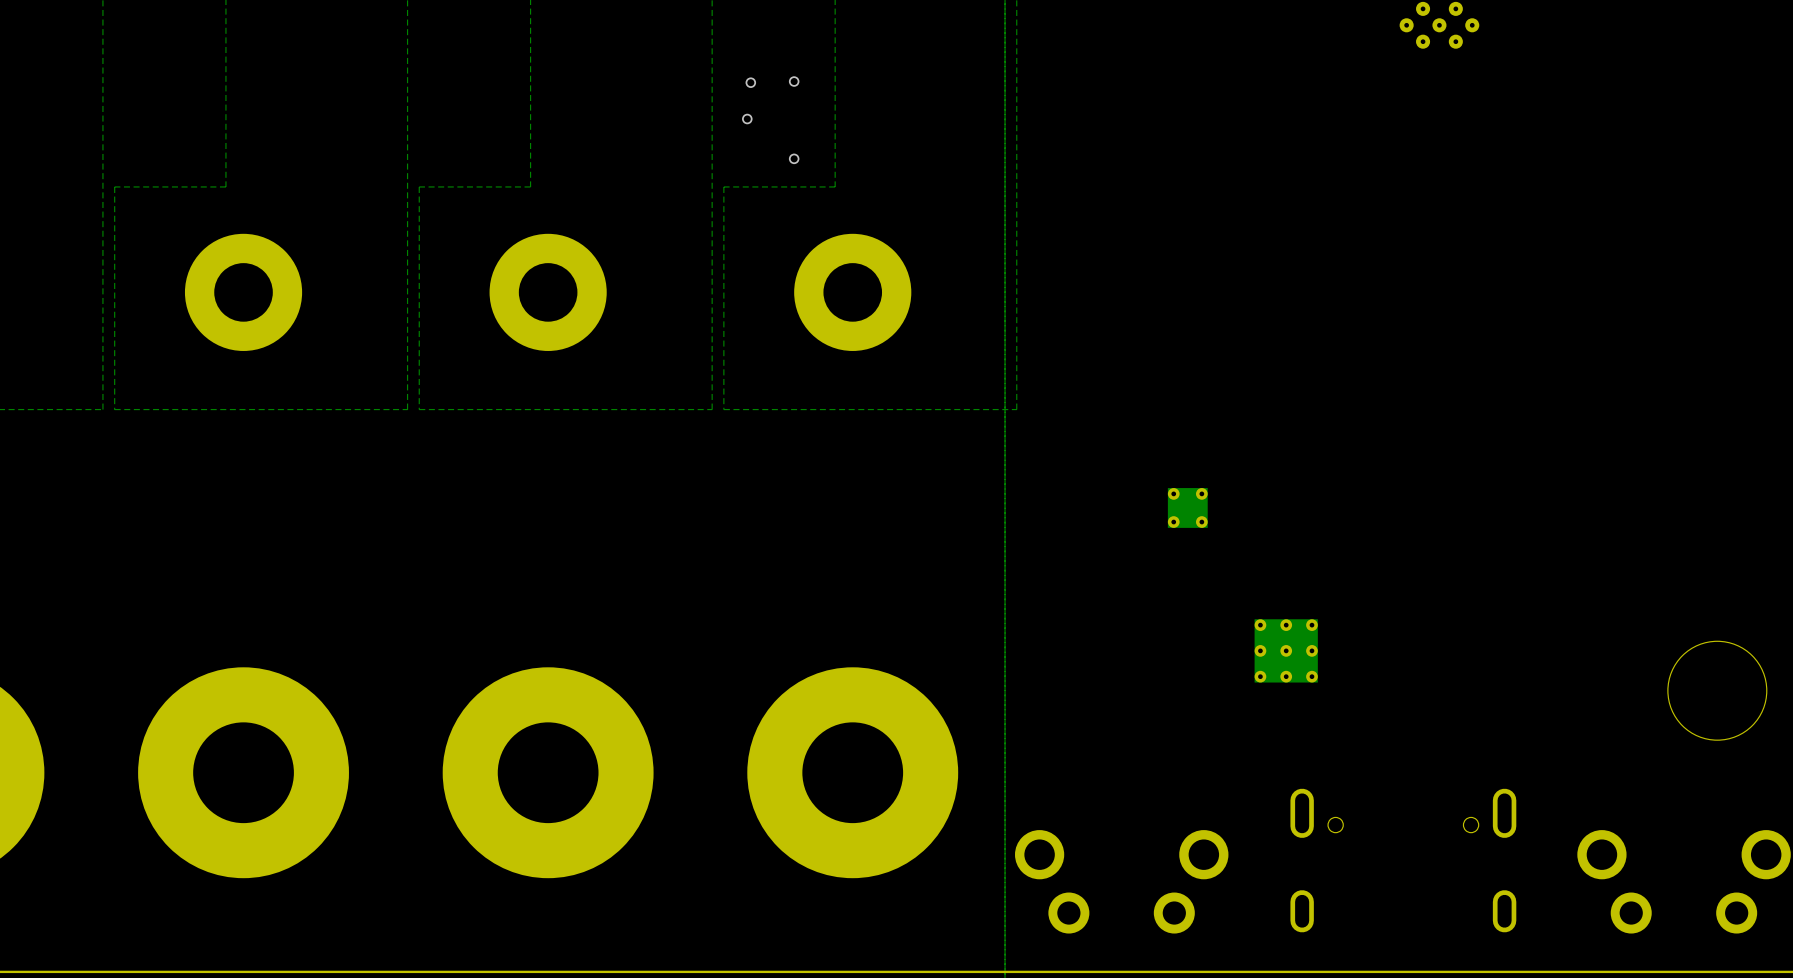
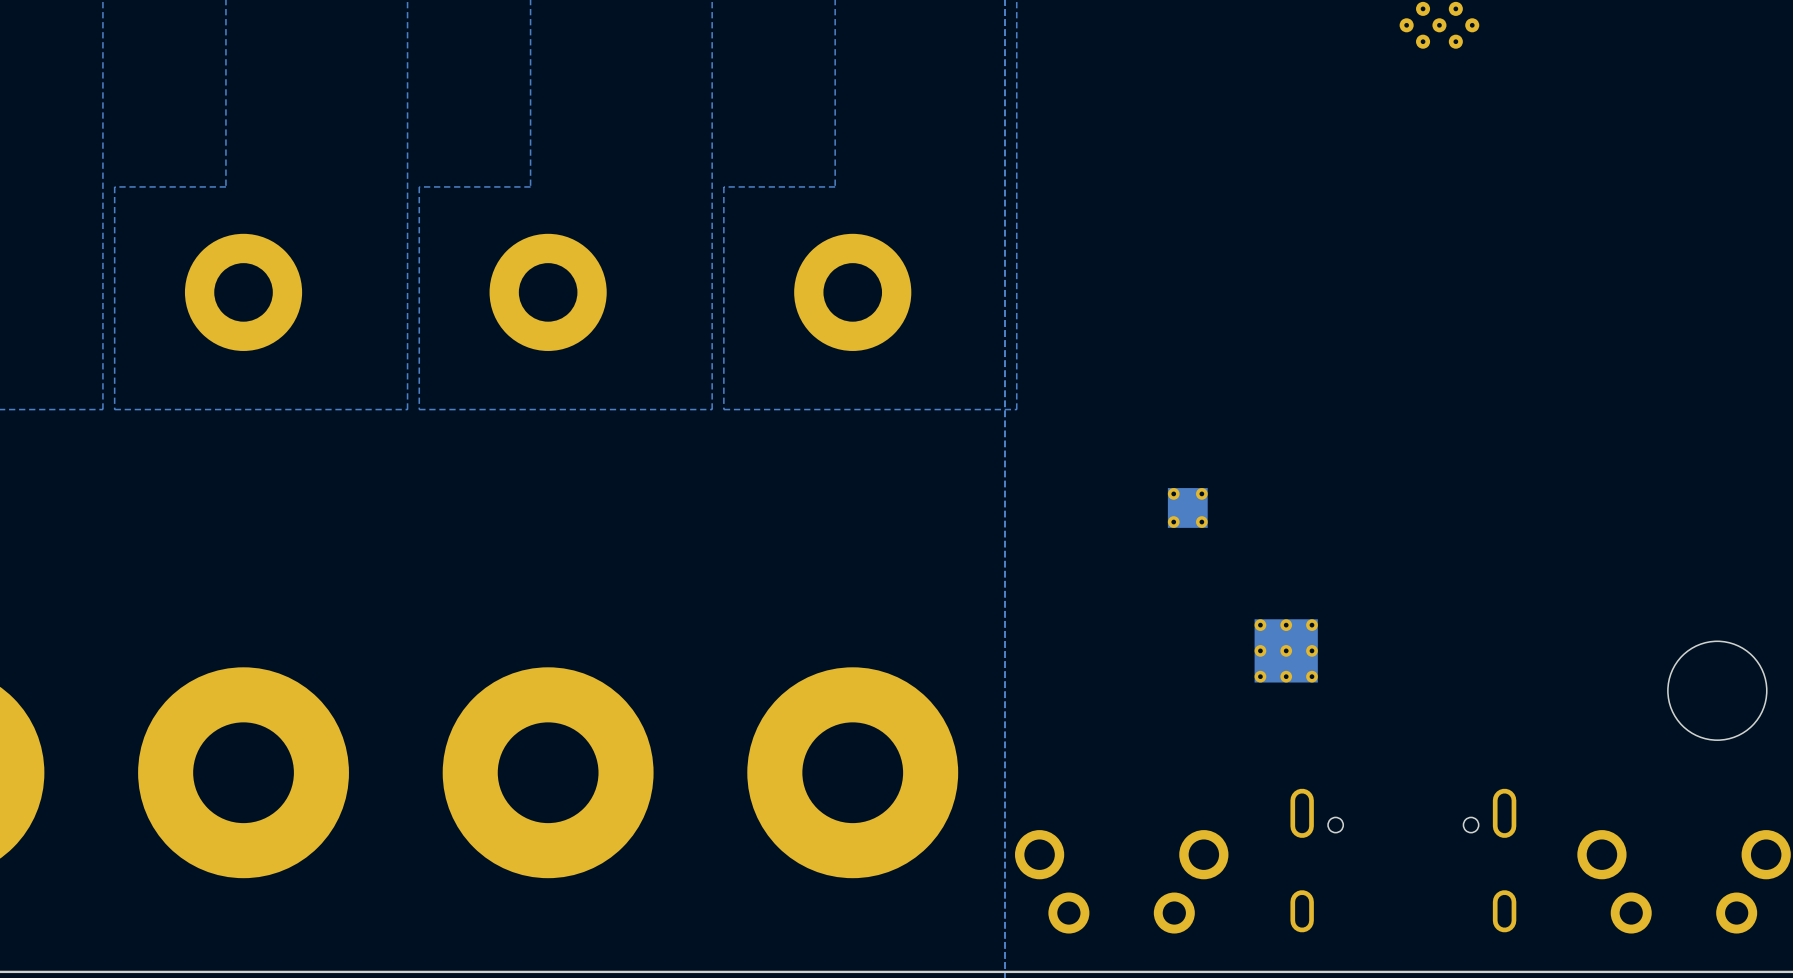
via: (794, 81) -> none
via: (750, 82) -> none
via: (747, 119) -> none
via: (794, 158) -> none

